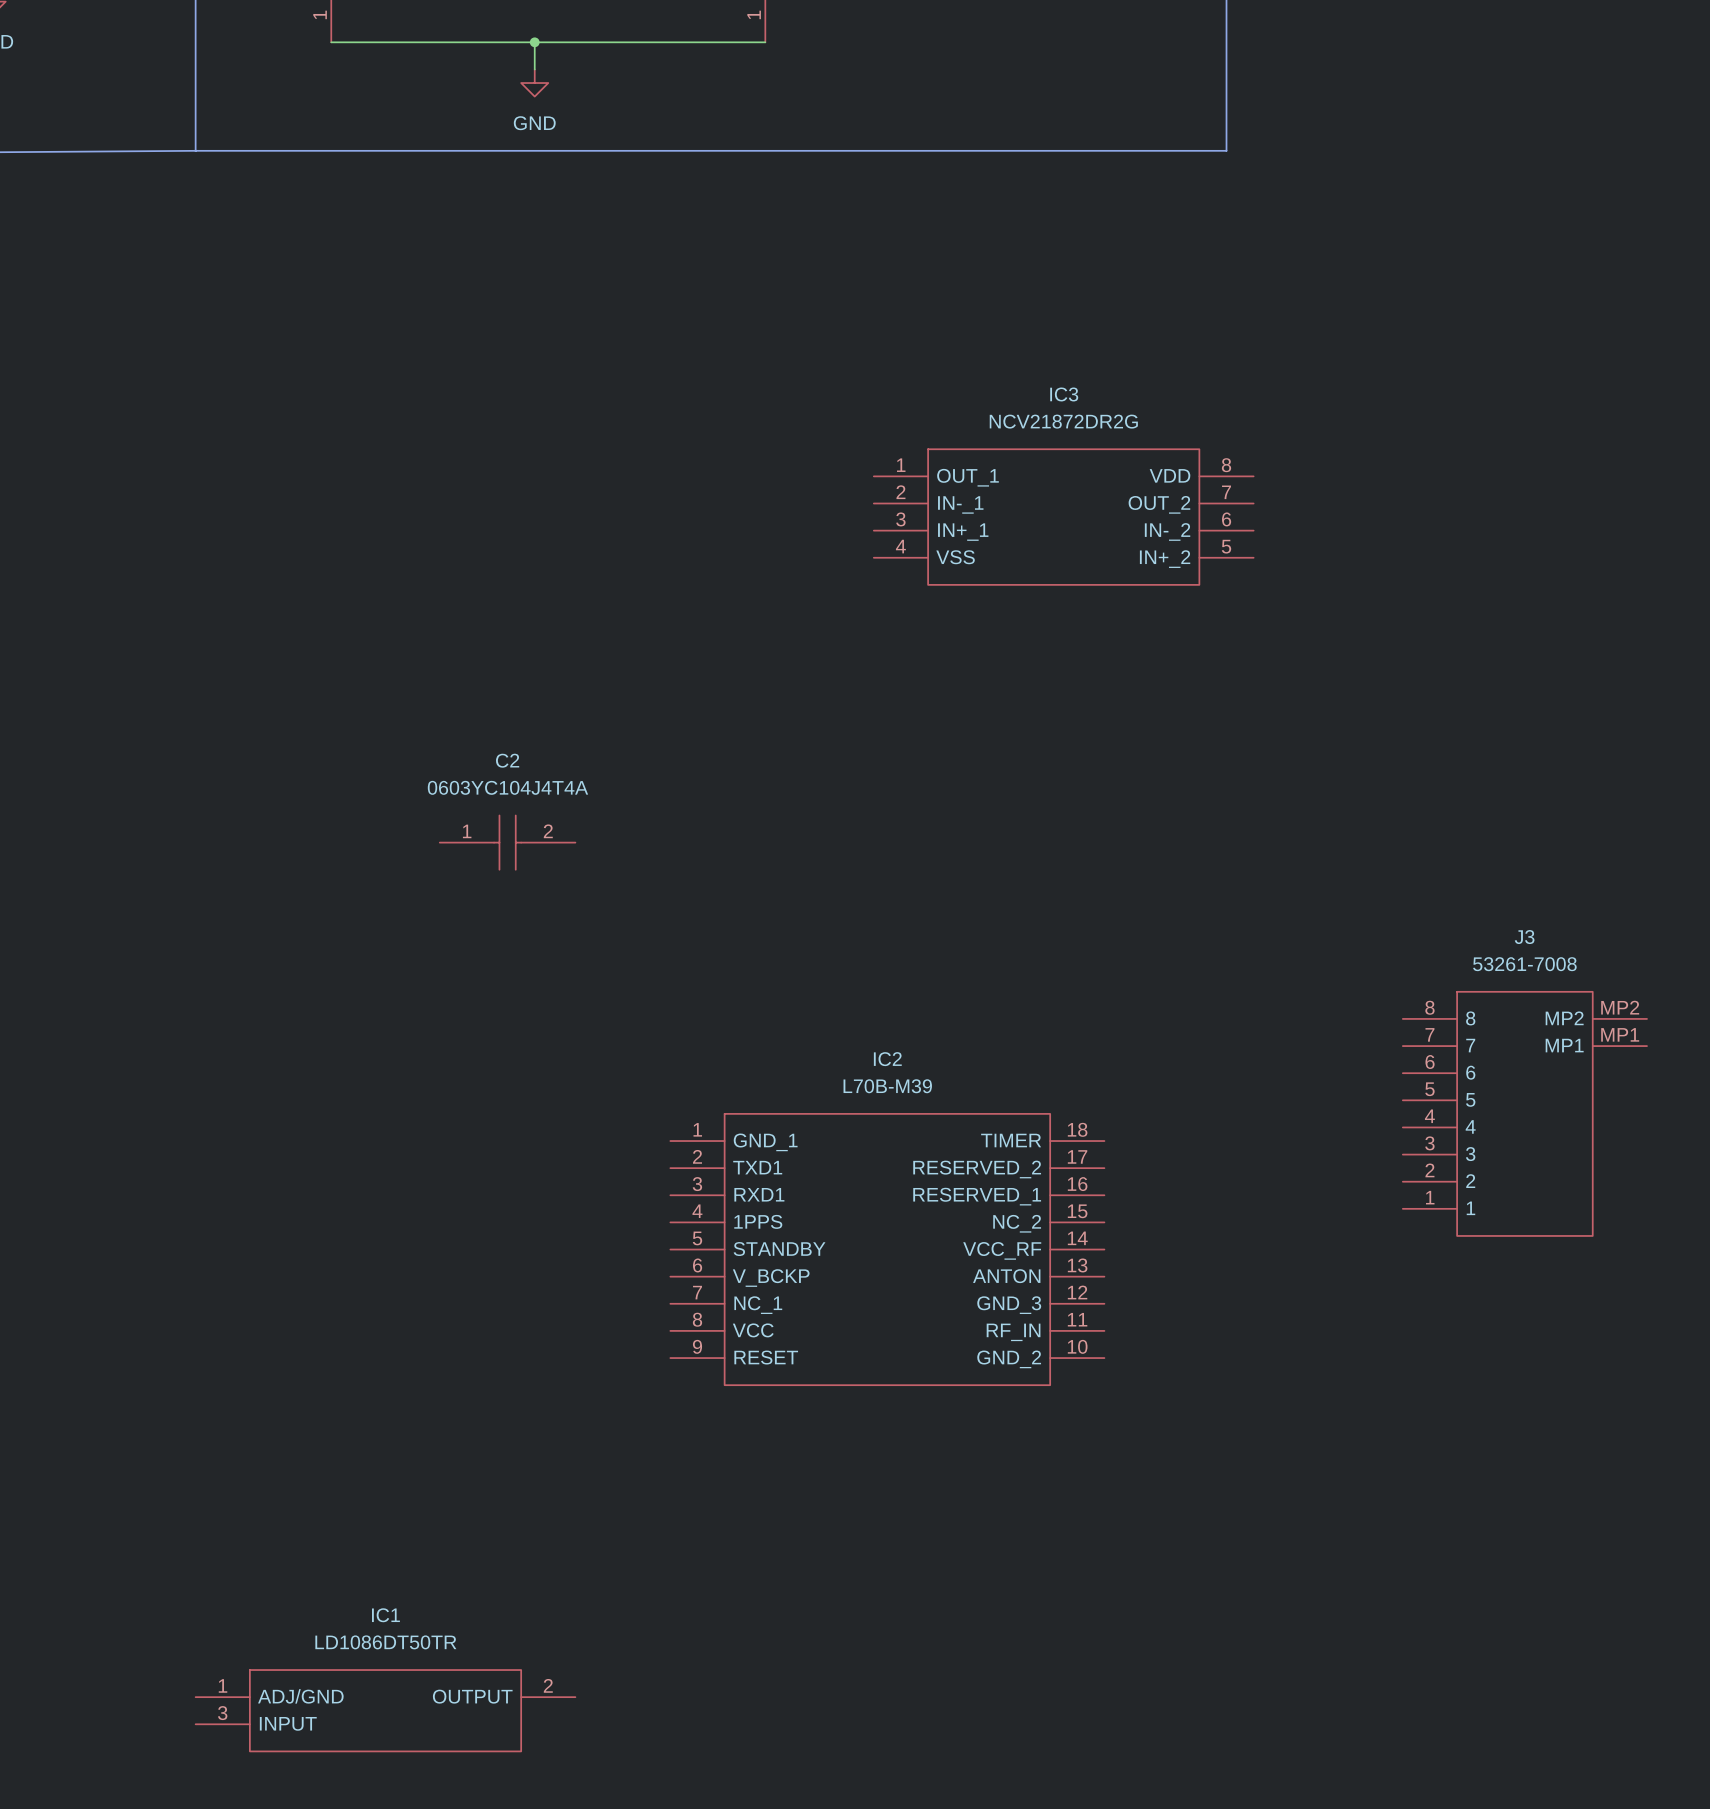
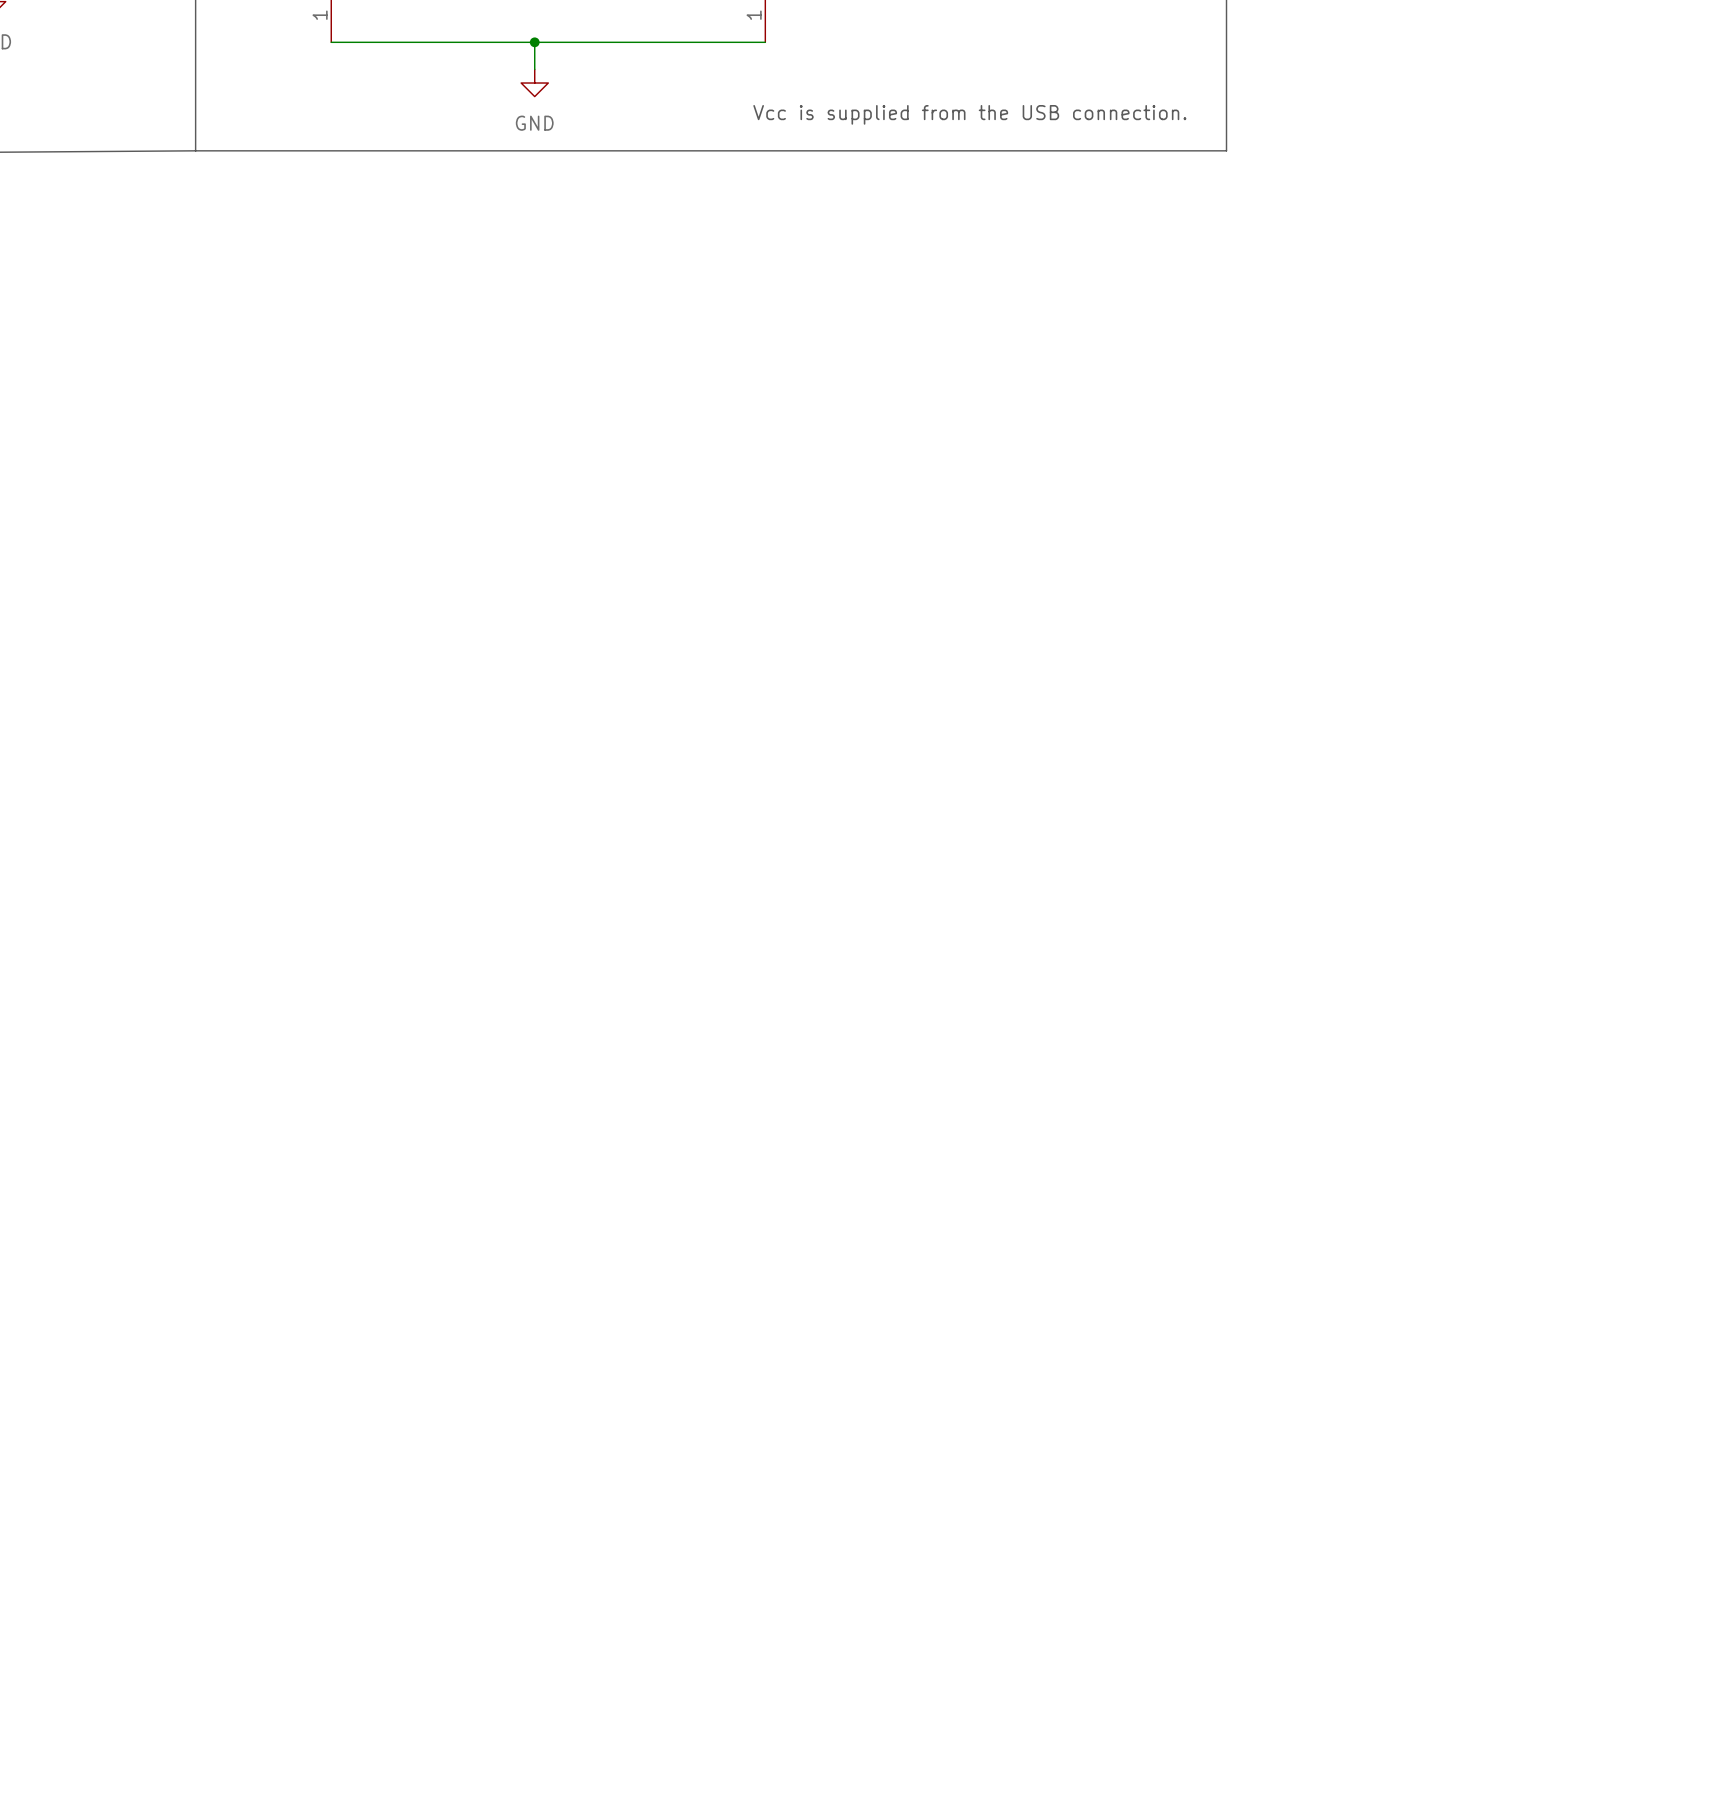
text: none -> Vcc is supplied from the USB connection. (969, 114)
IC3: NCV21872DR2G (1063, 517) -> none
C2: 0603YC104J4T4A (507, 842) -> none
J3: 53261-7008 (1524, 1113) -> none
IC2: L70B-M39 (887, 1249) -> none
IC1: LD1086DT50TR (385, 1710) -> none

